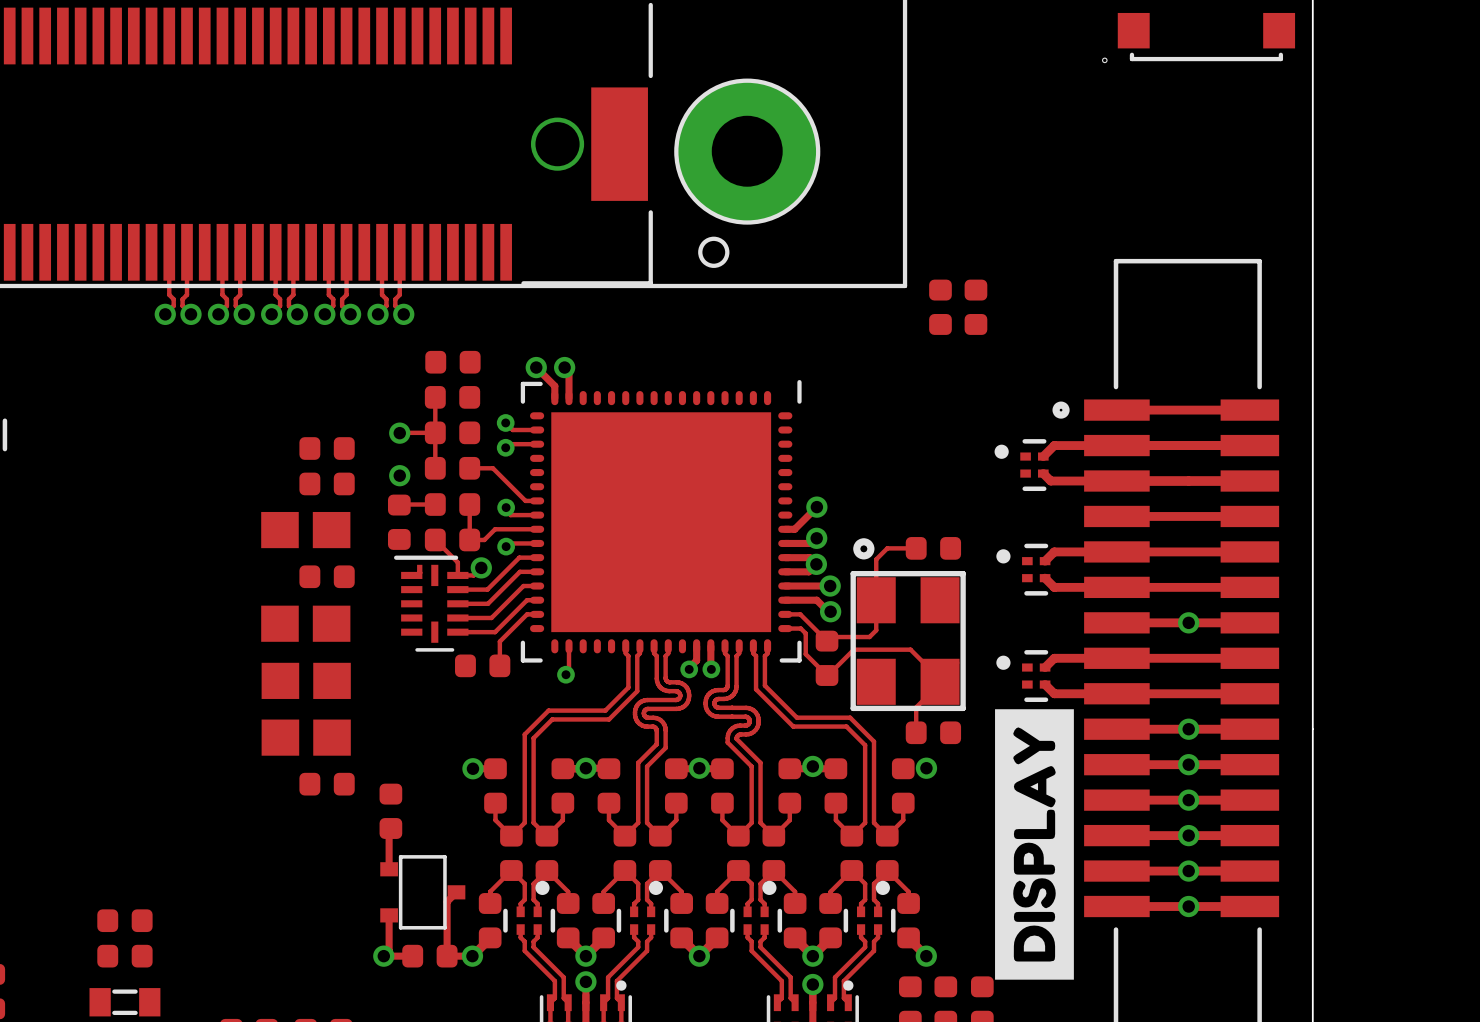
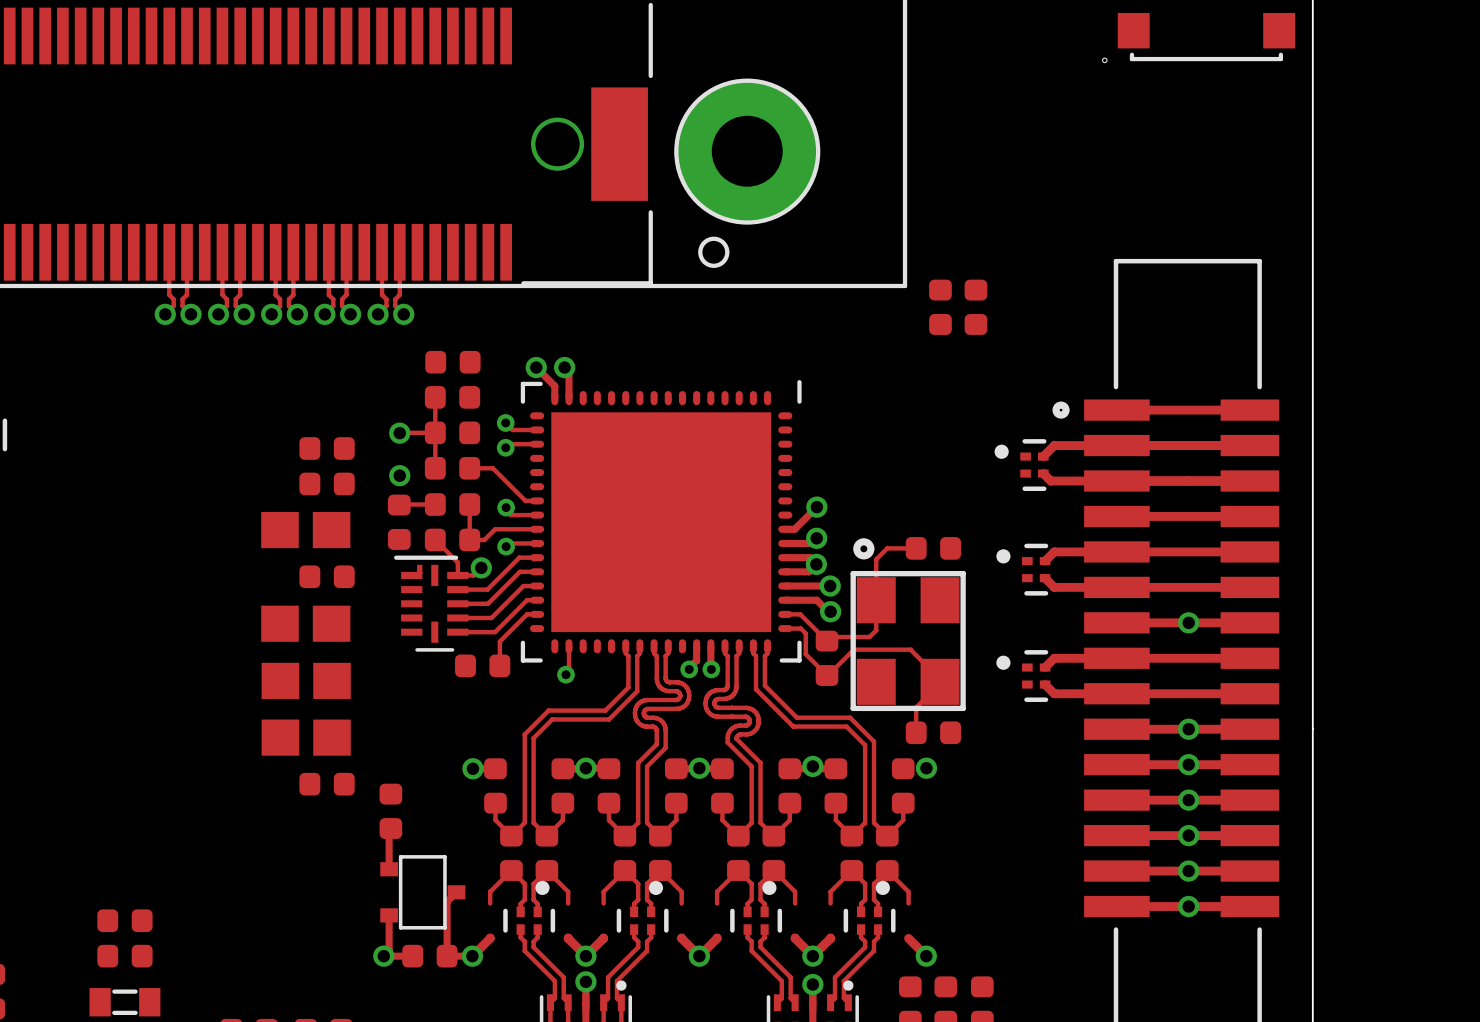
drawing: [995, 709, 1074, 980] -> none
part: (490, 920) -> none
part: (568, 920) -> none
part: (603, 920) -> none
part: (681, 920) -> none
part: (717, 920) -> none
part: (795, 920) -> none
part: (830, 920) -> none
part: (908, 920) -> none

